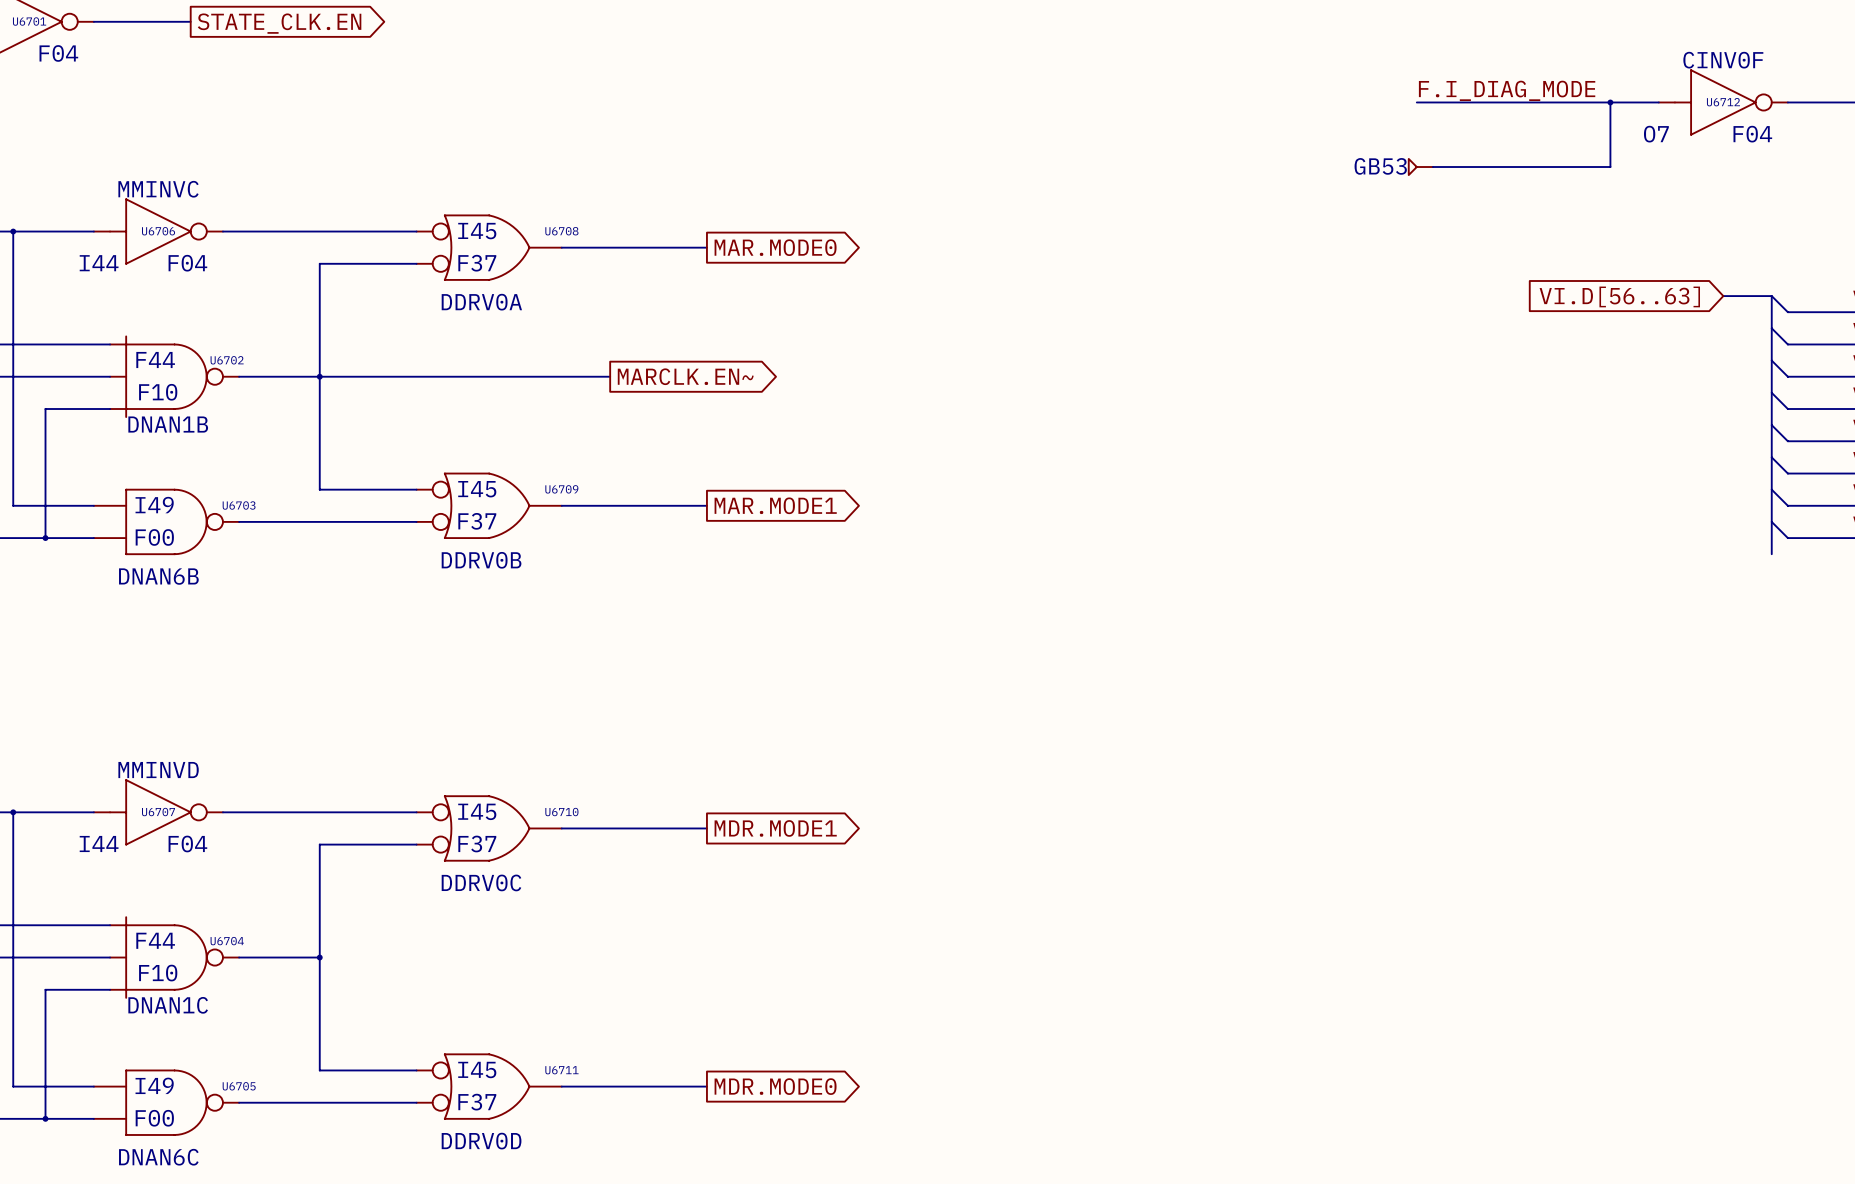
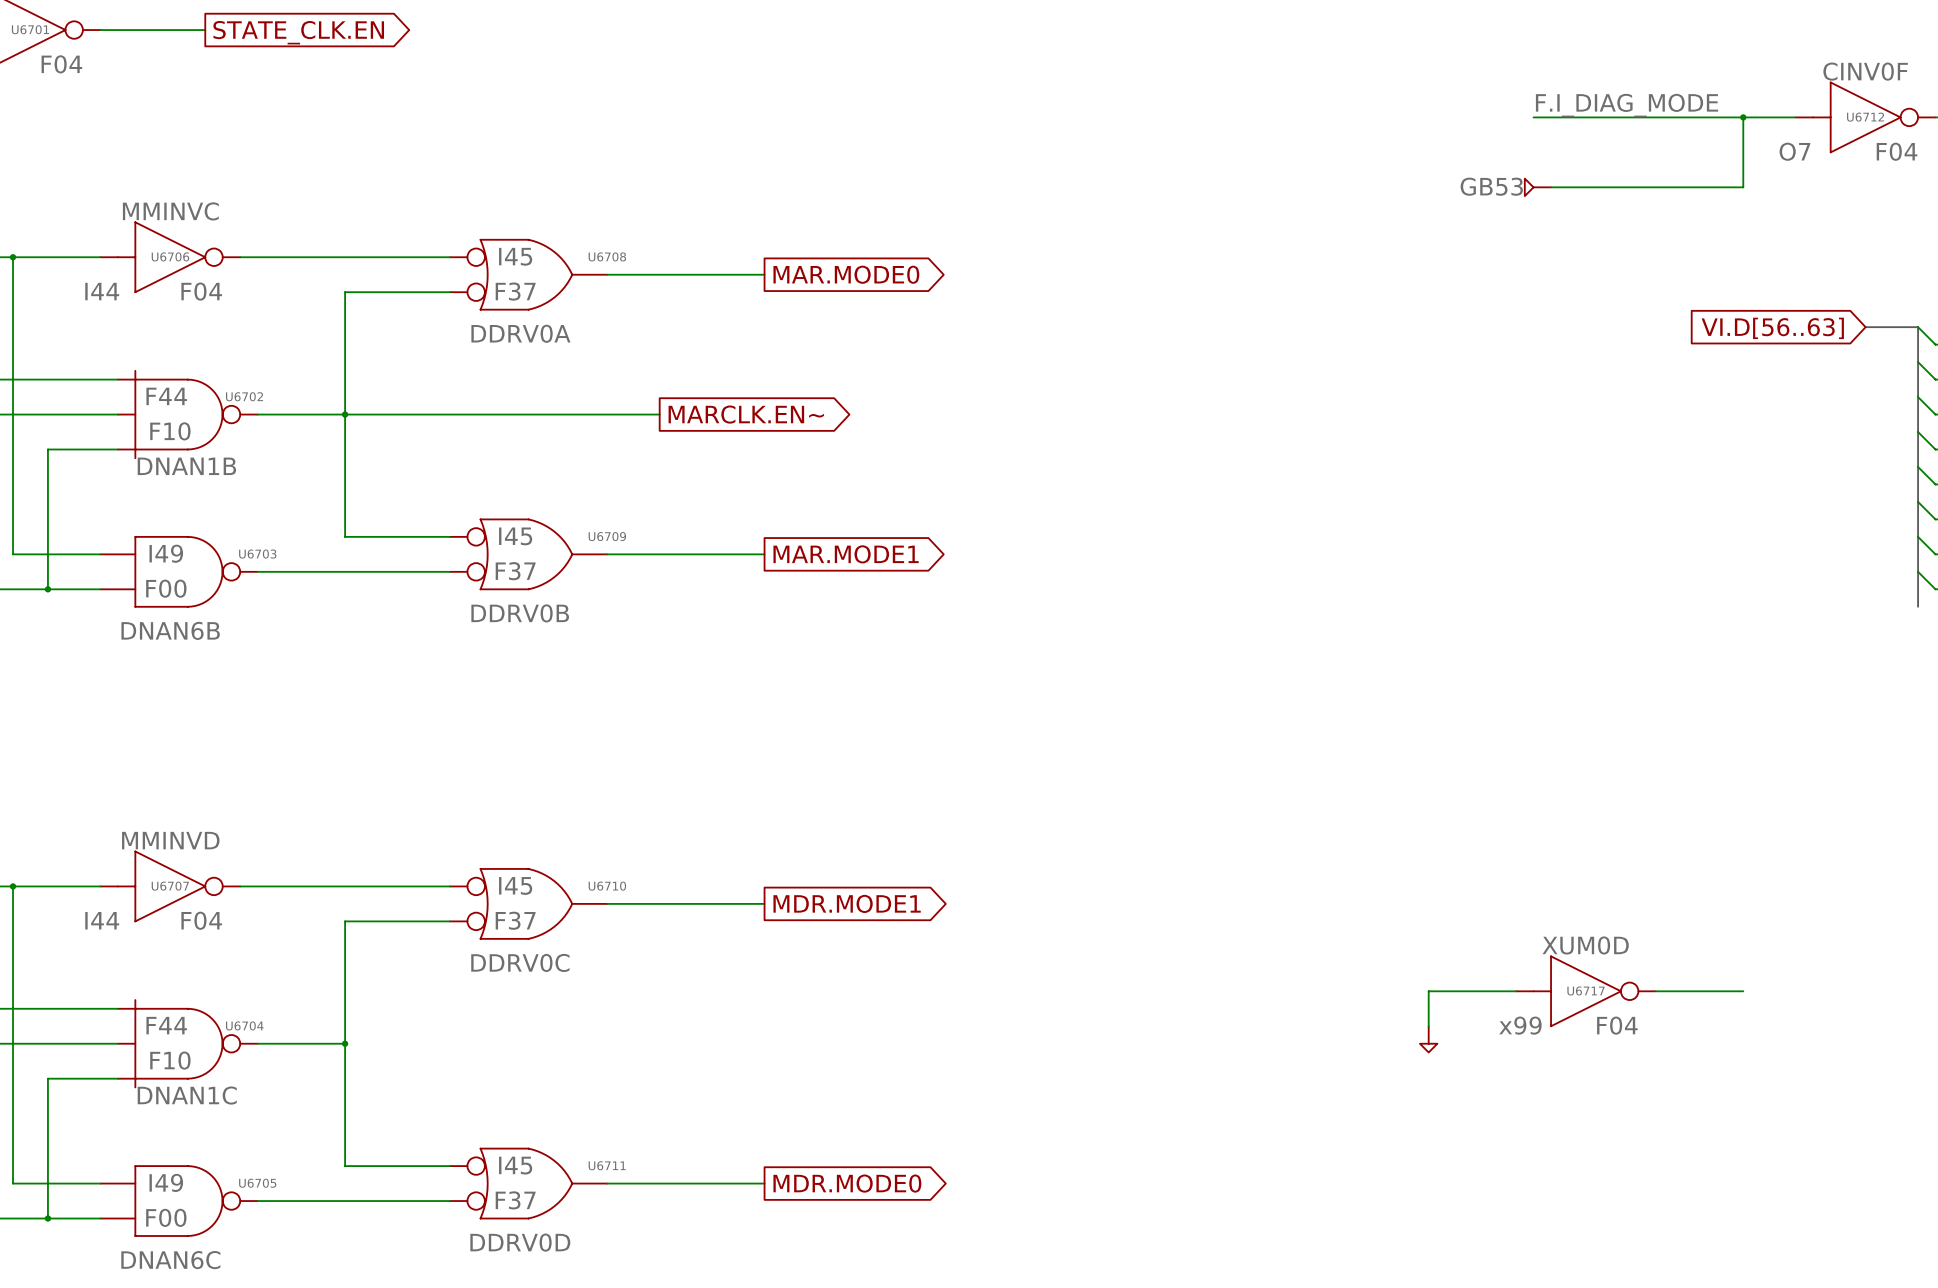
wire: none -> (1516, 991) (1428, 991) (1428, 1026)
U6717: none -> F04 (1585, 991)
wire: none -> (1655, 991) (1743, 991)
power symbol: none -> (1428, 1039)

